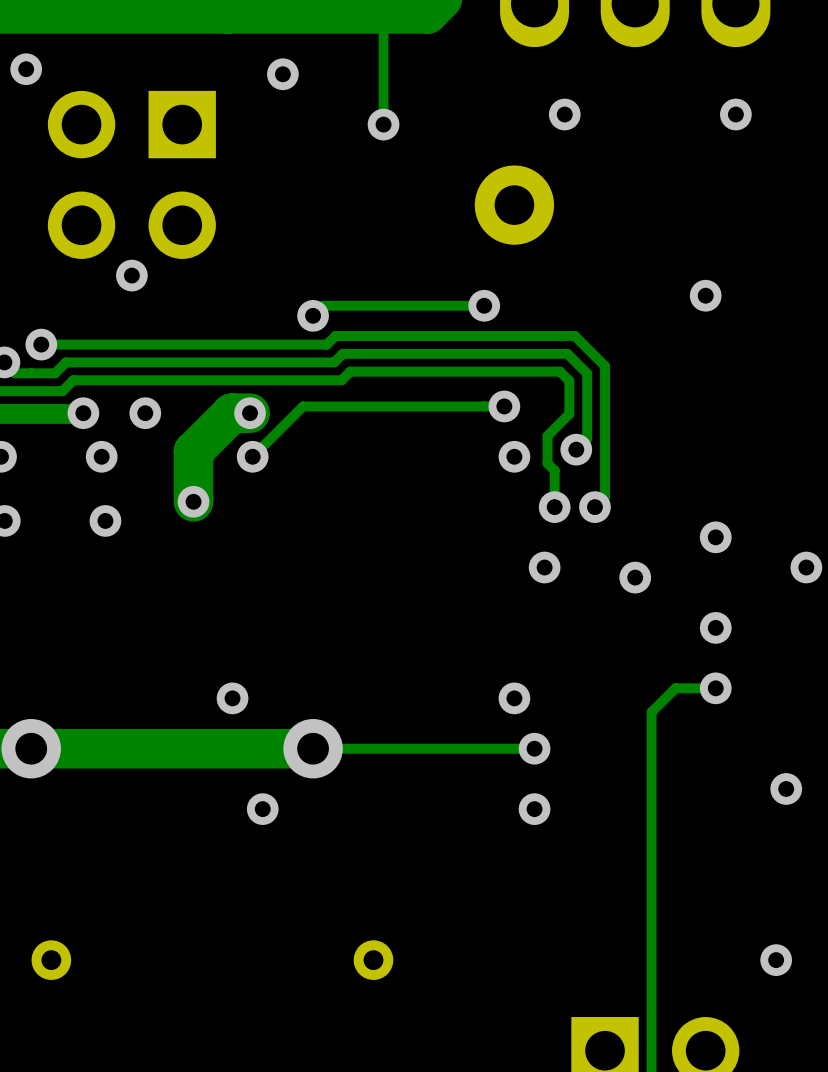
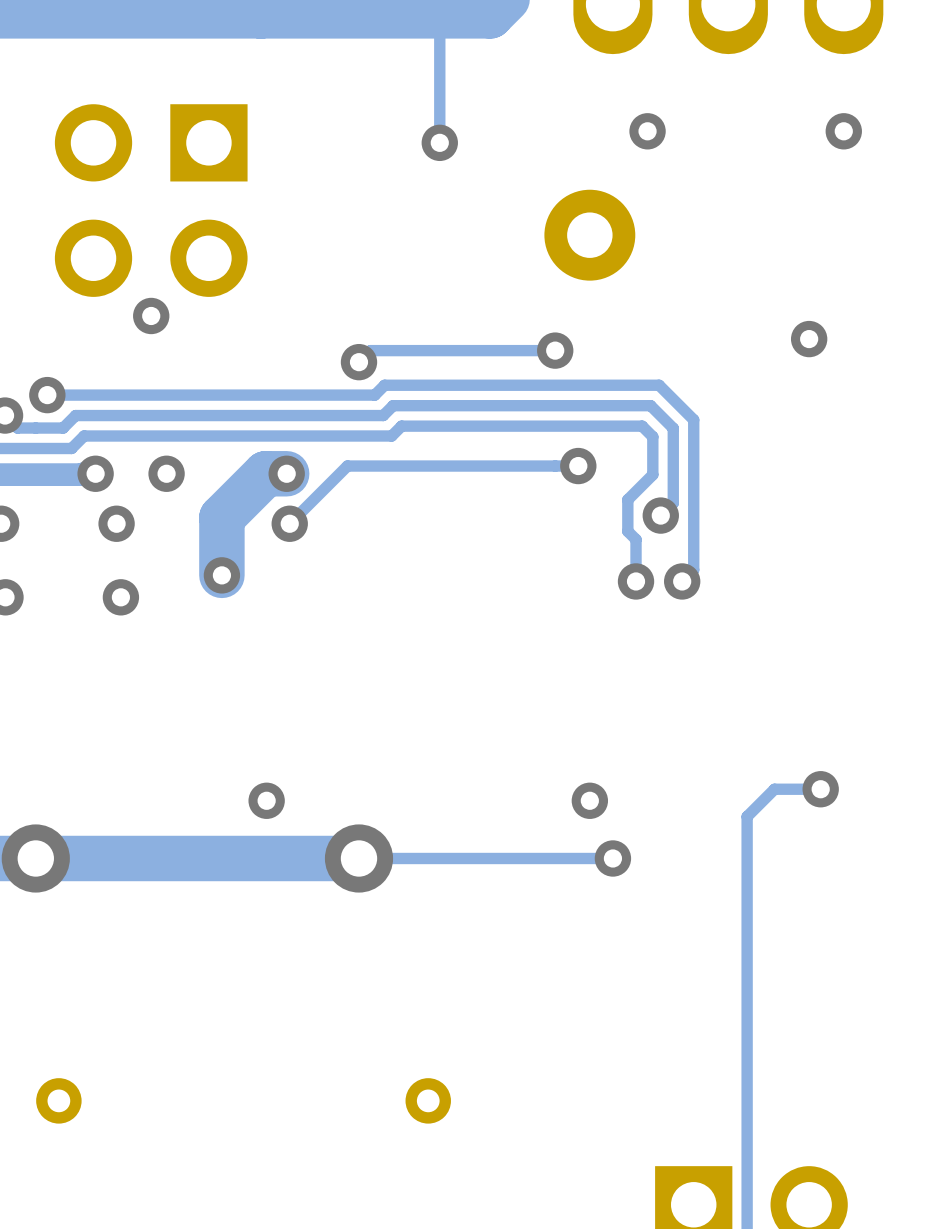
via: (26, 69) -> none
via: (282, 74) -> none
via: (514, 456) -> none
via: (715, 537) -> none
via: (544, 567) -> none
via: (806, 567) -> none
via: (635, 577) -> none
via: (715, 627) -> none
via: (786, 788) -> none
via: (262, 809) -> none
via: (534, 809) -> none
via: (776, 960) -> none

